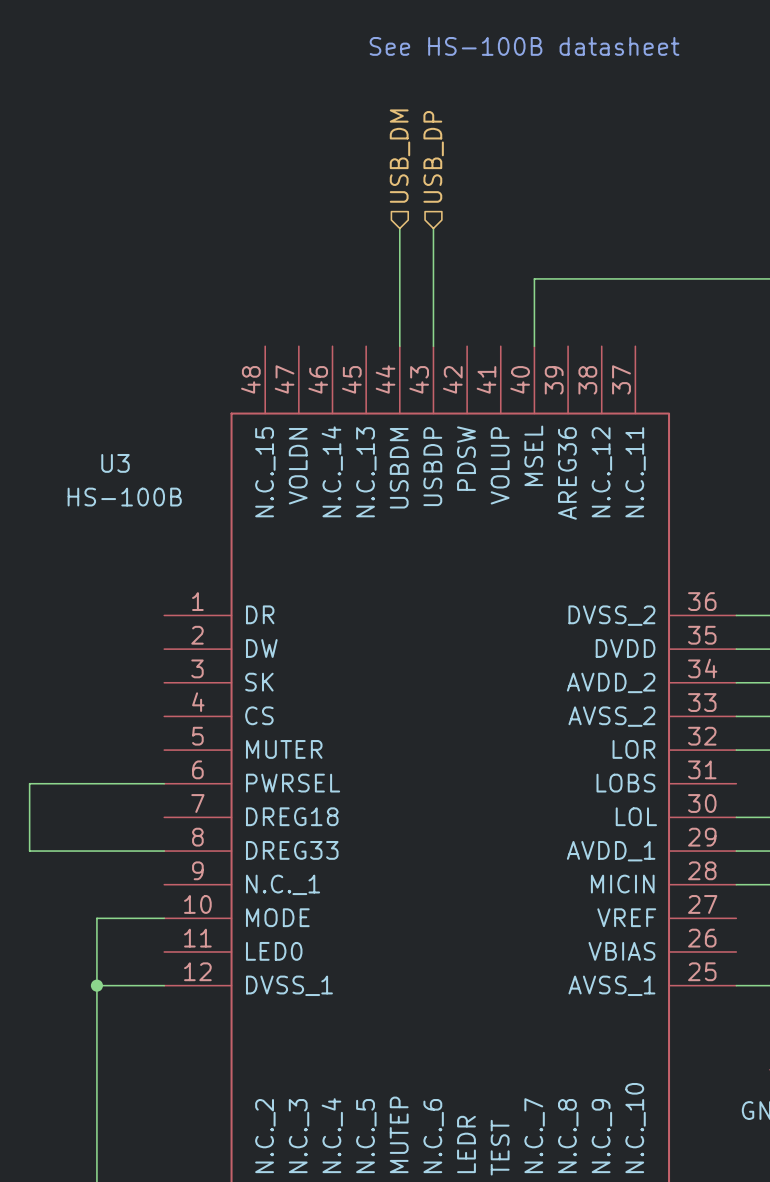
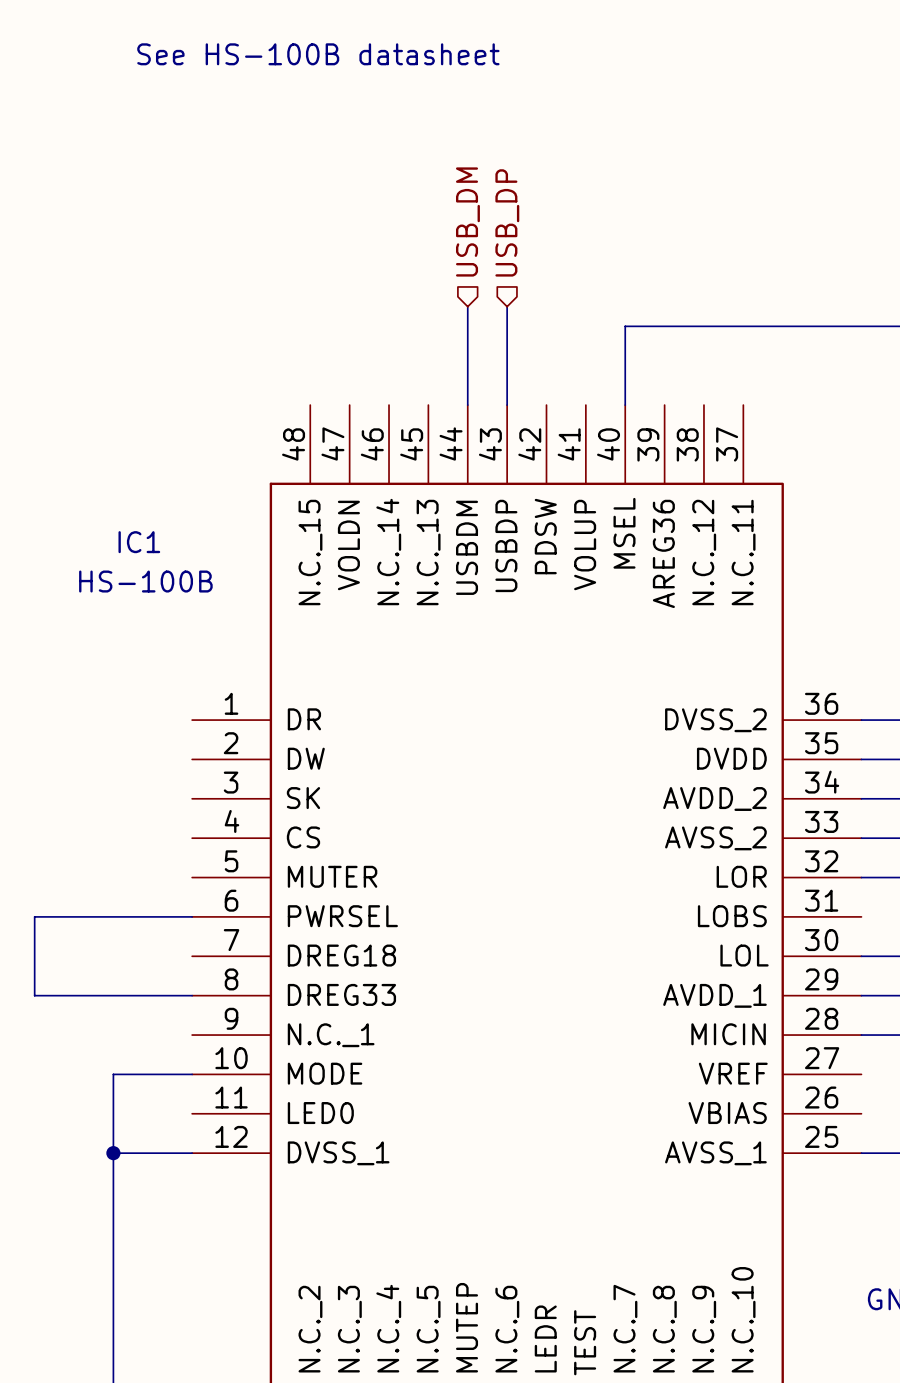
text position: See HS-100B datasheet (524, 46) -> See HS-100B datasheet (318, 54)
hierarchical label position: USB_DM (399, 156) -> USB_DM (467, 221)
hierarchical label position: USB_DP (433, 156) -> USB_DP (507, 222)
wire: (399, 228) (399, 262) -> none
wire: (433, 228) (433, 262) -> none
U3 name: U3 (115, 463) -> IC1 (139, 542)

